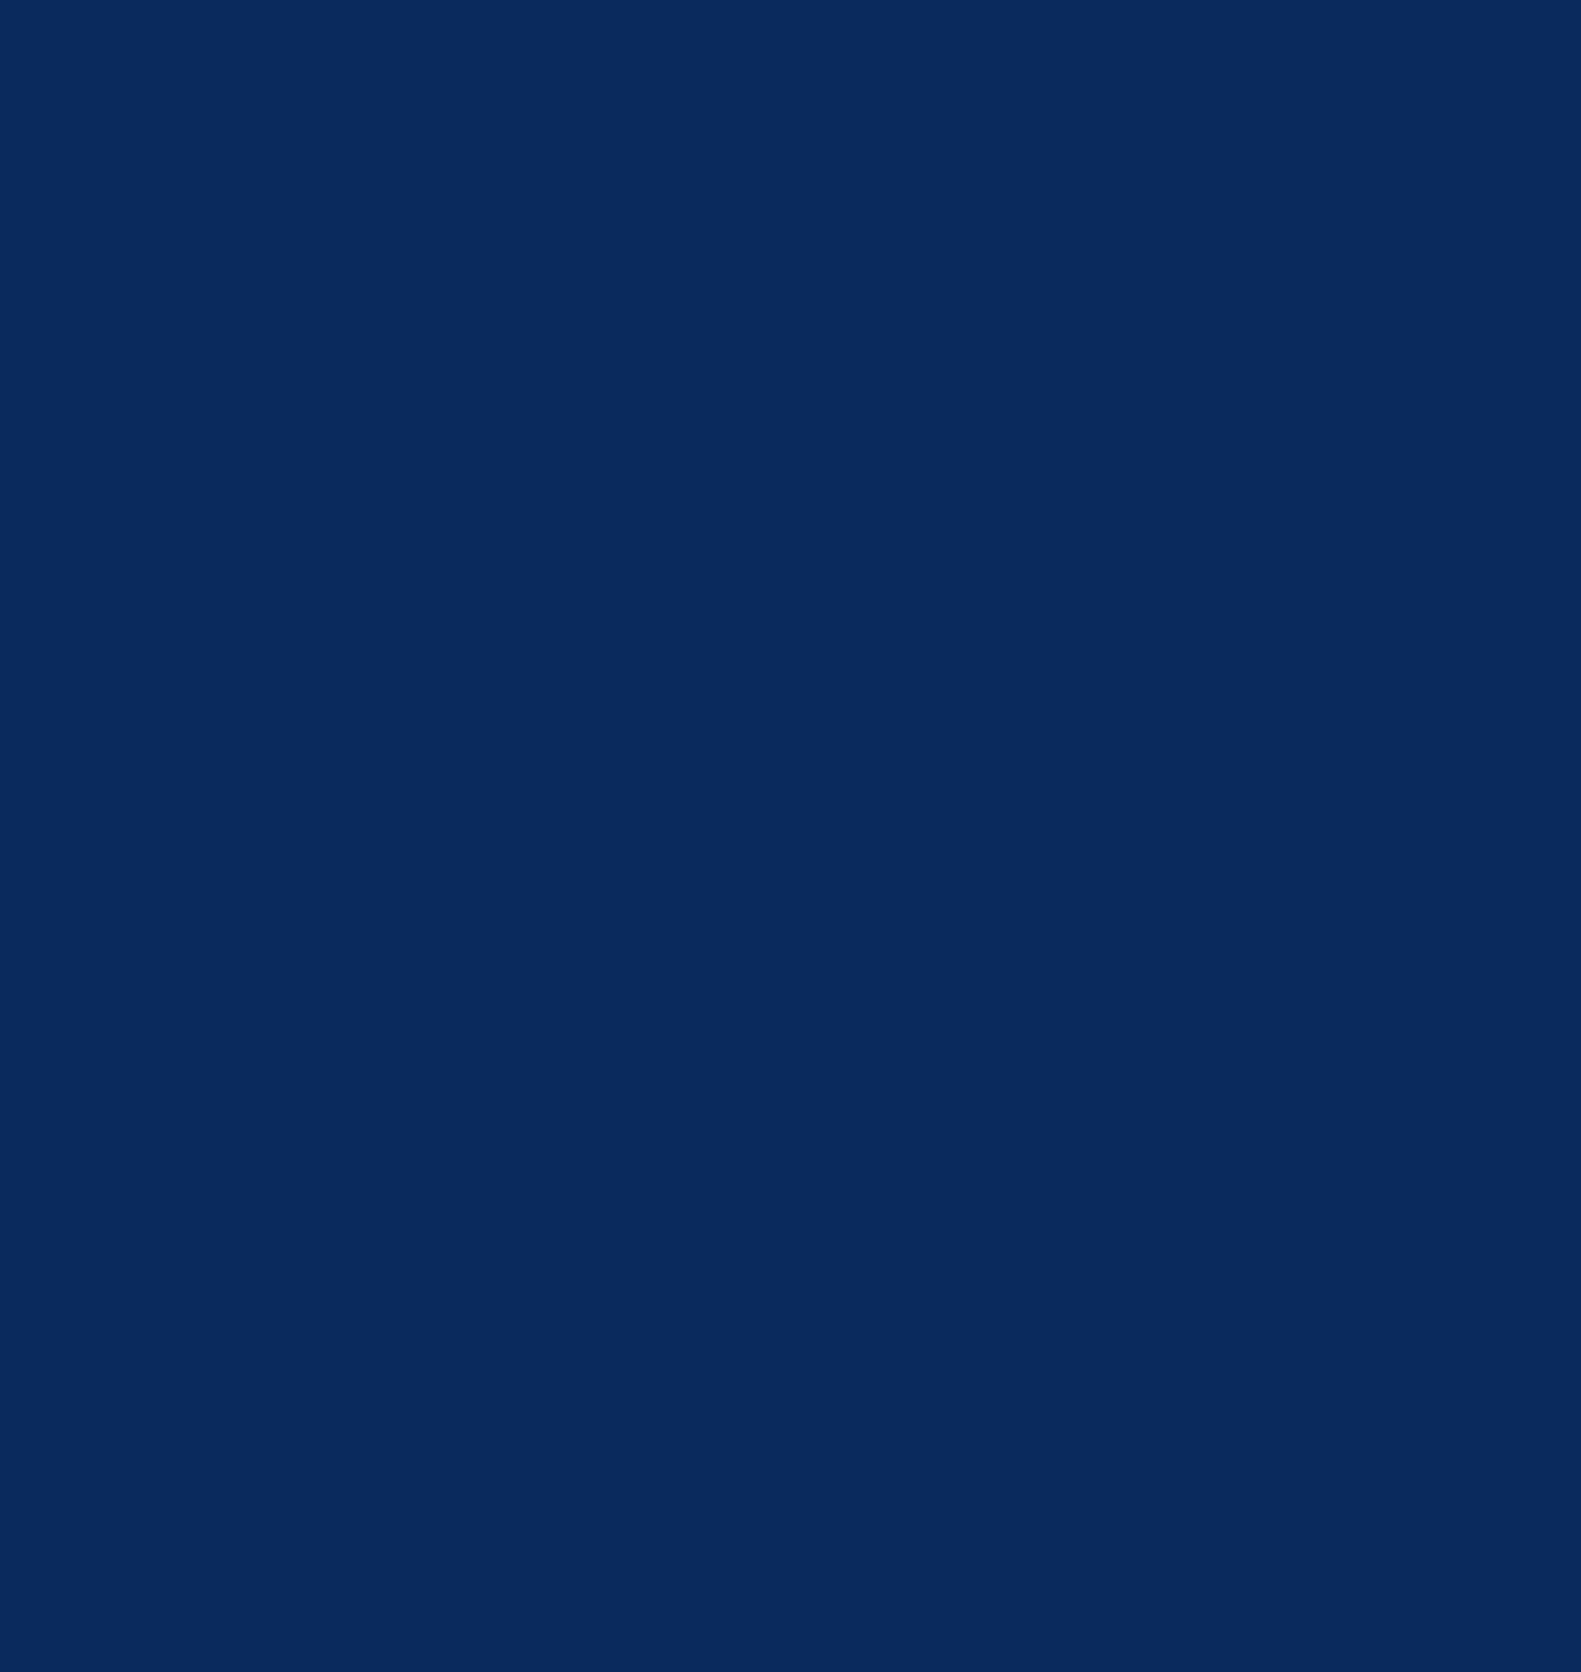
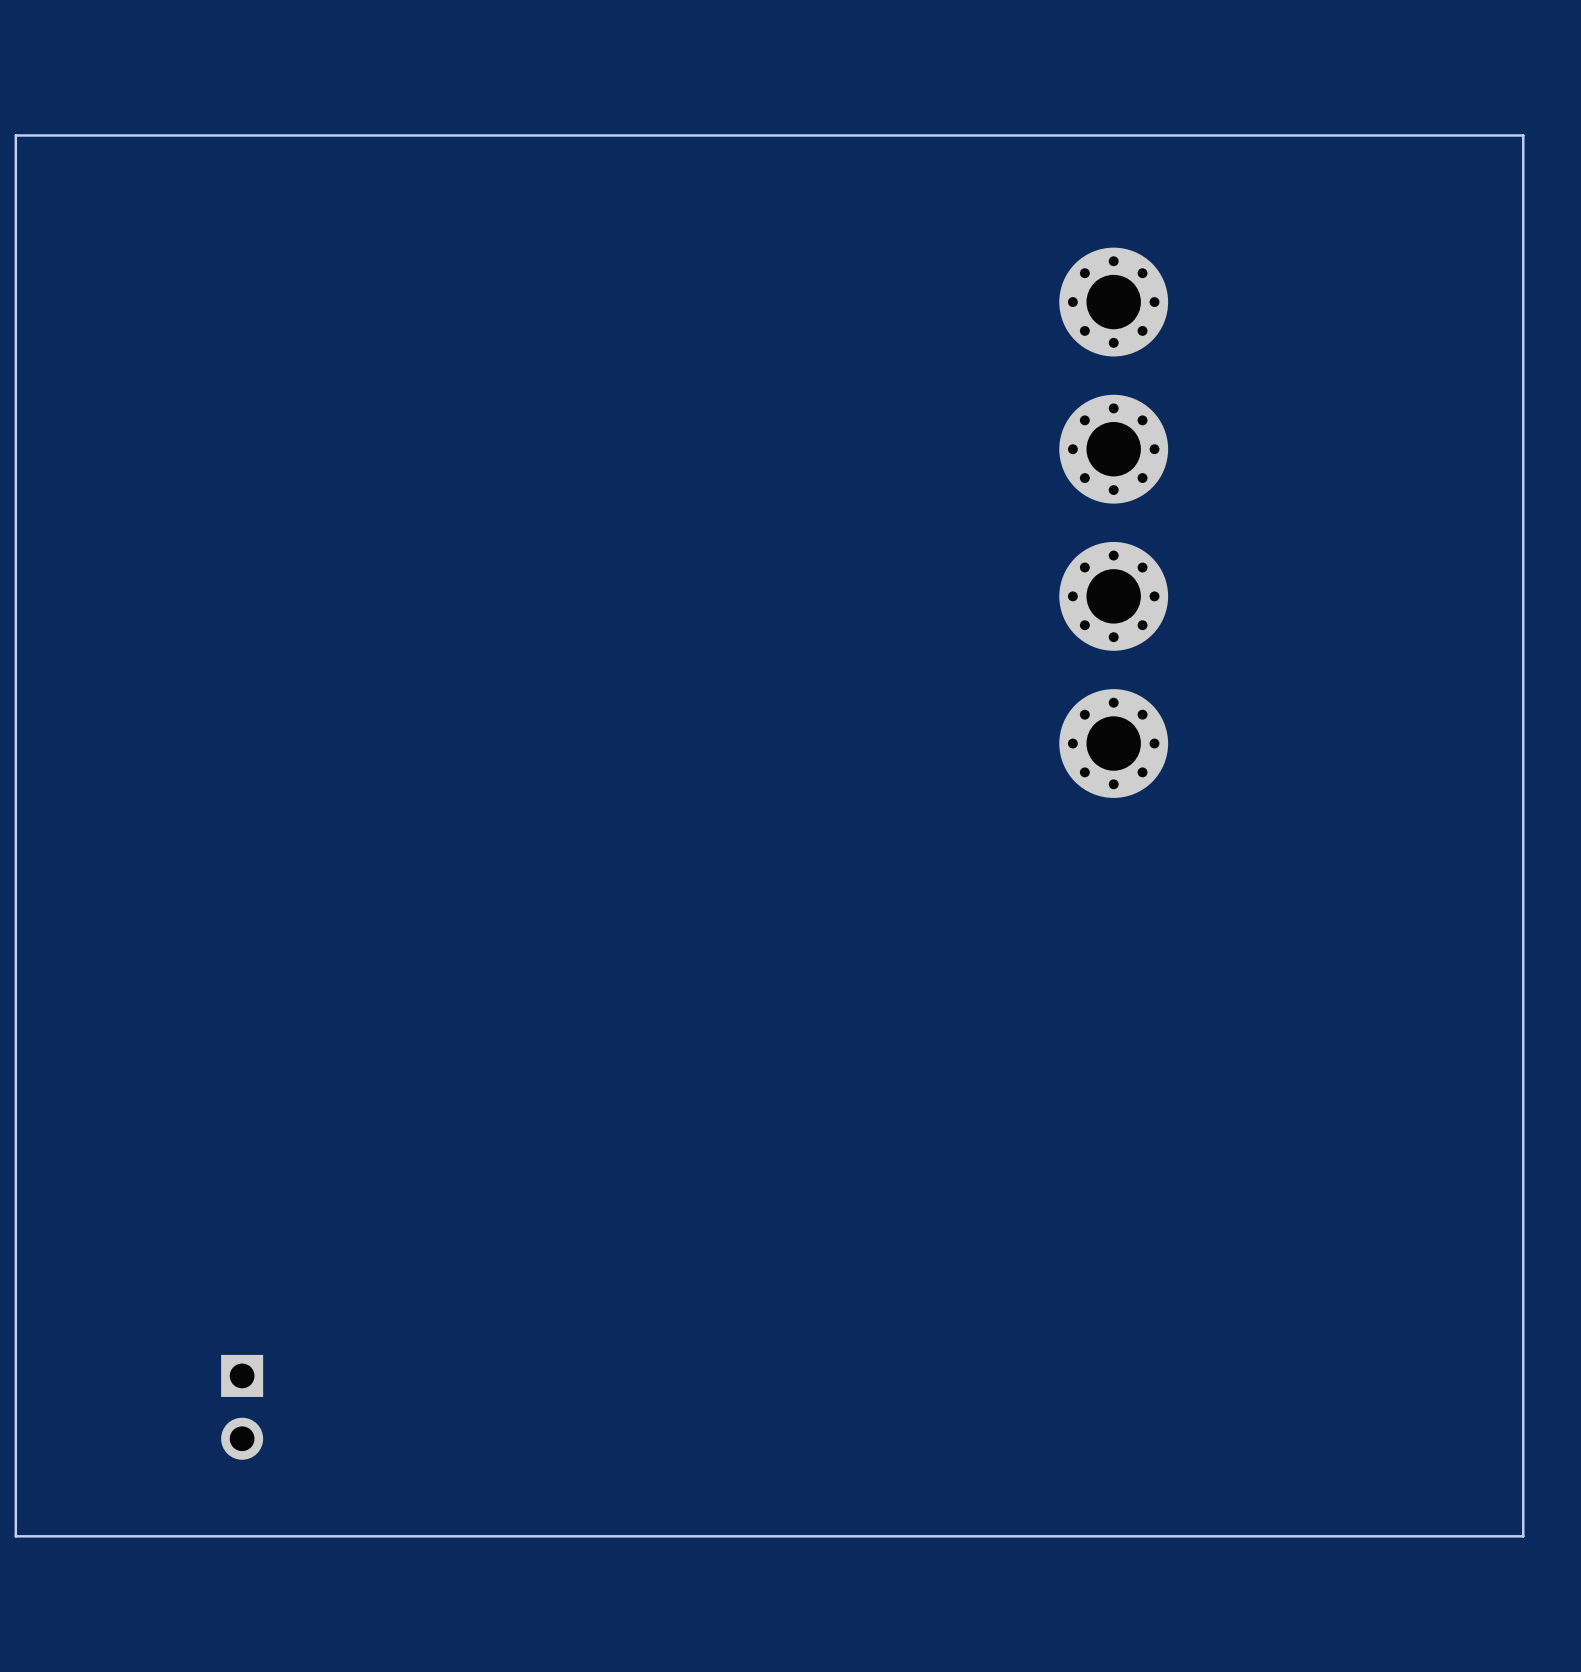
board edge: none -> (1523, 135) (15, 135) (15, 1536) (1523, 1536) (1523, 135)
part: none -> (1113, 302)
part: none -> (1113, 449)
part: none -> (1113, 596)
part: none -> (1113, 743)
part: none -> (242, 1407)

